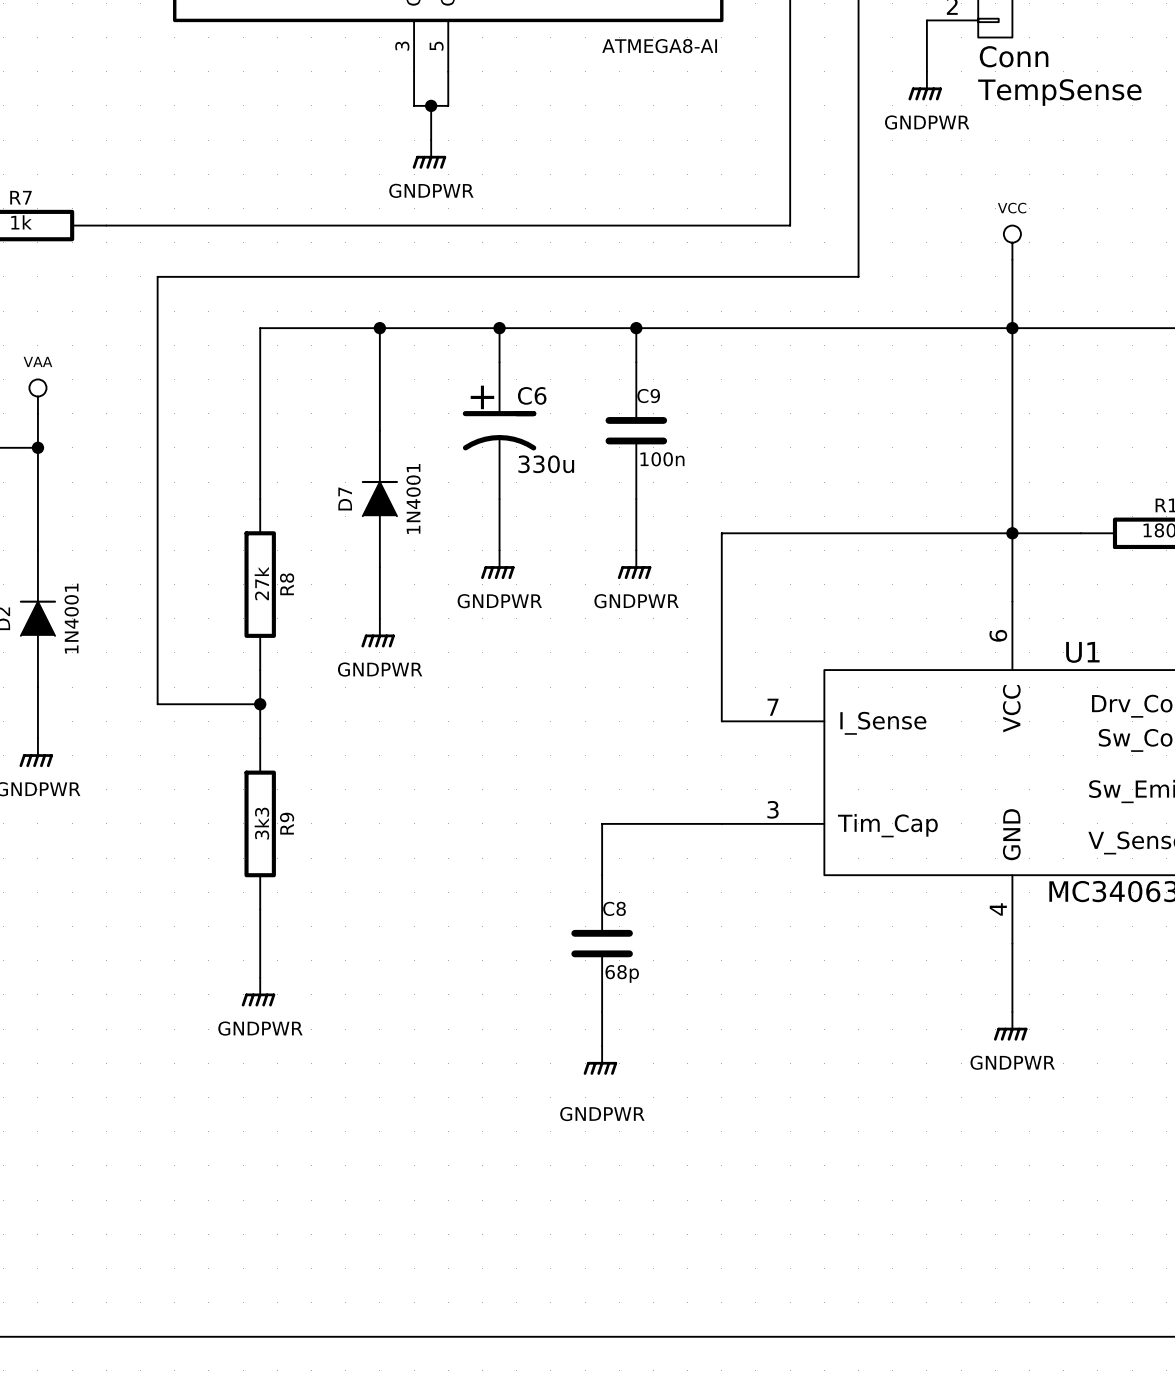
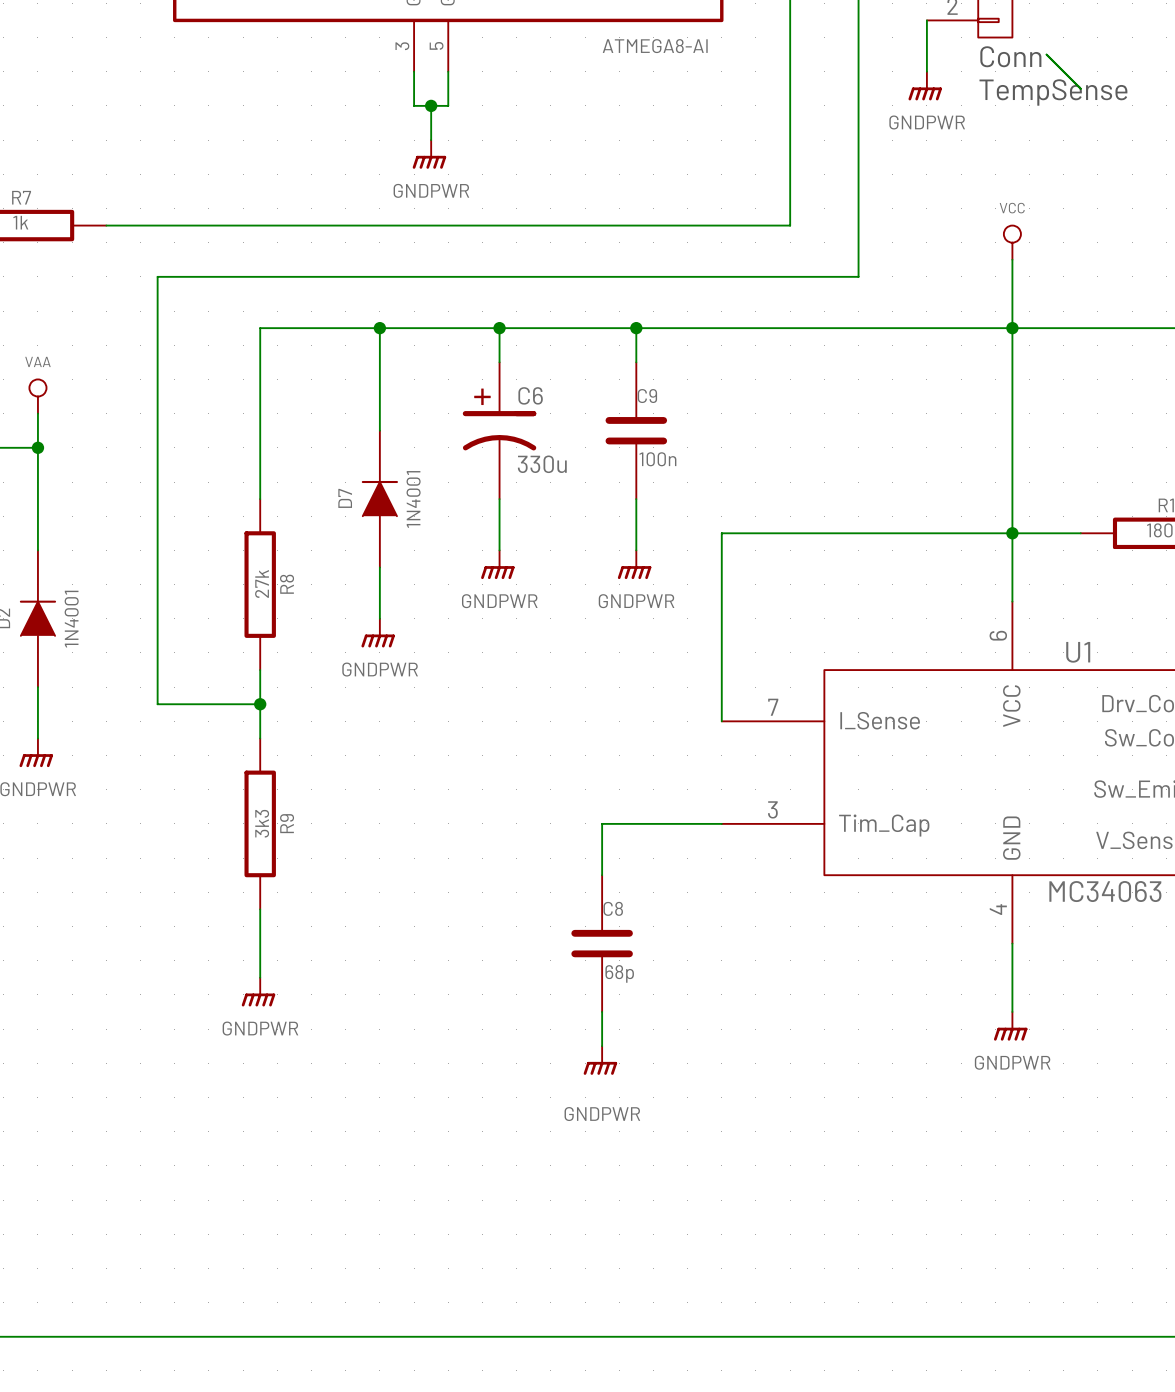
wire: none -> (1046, 54) (1080, 88)

